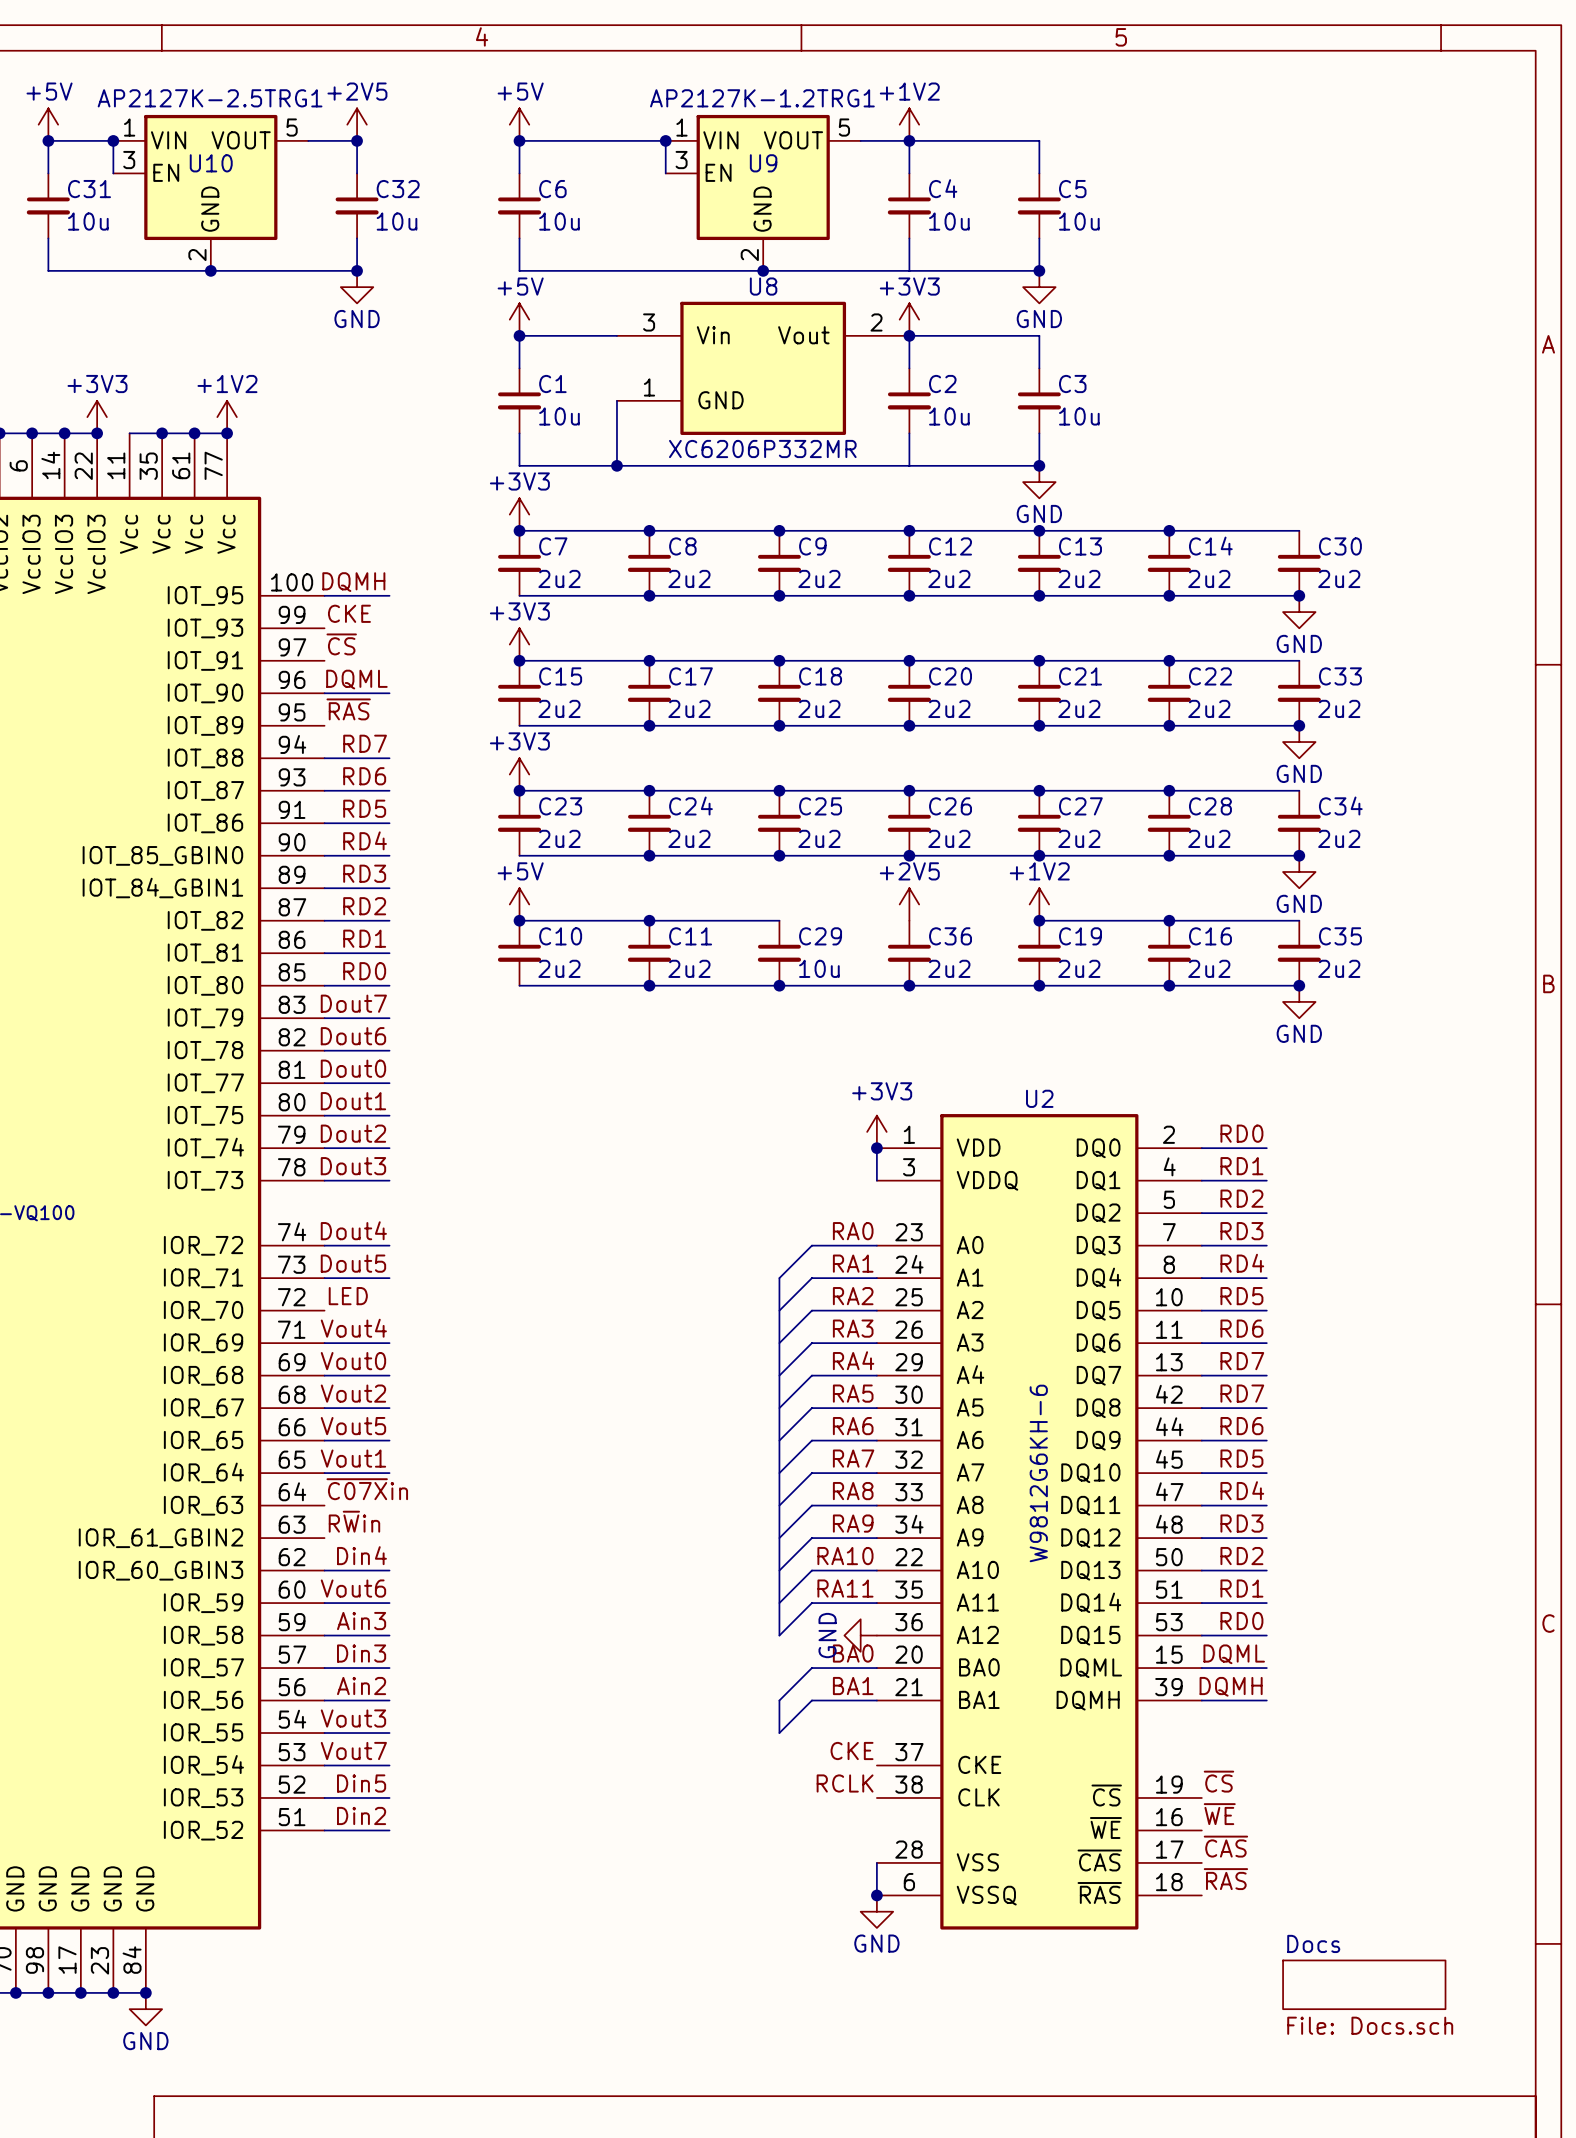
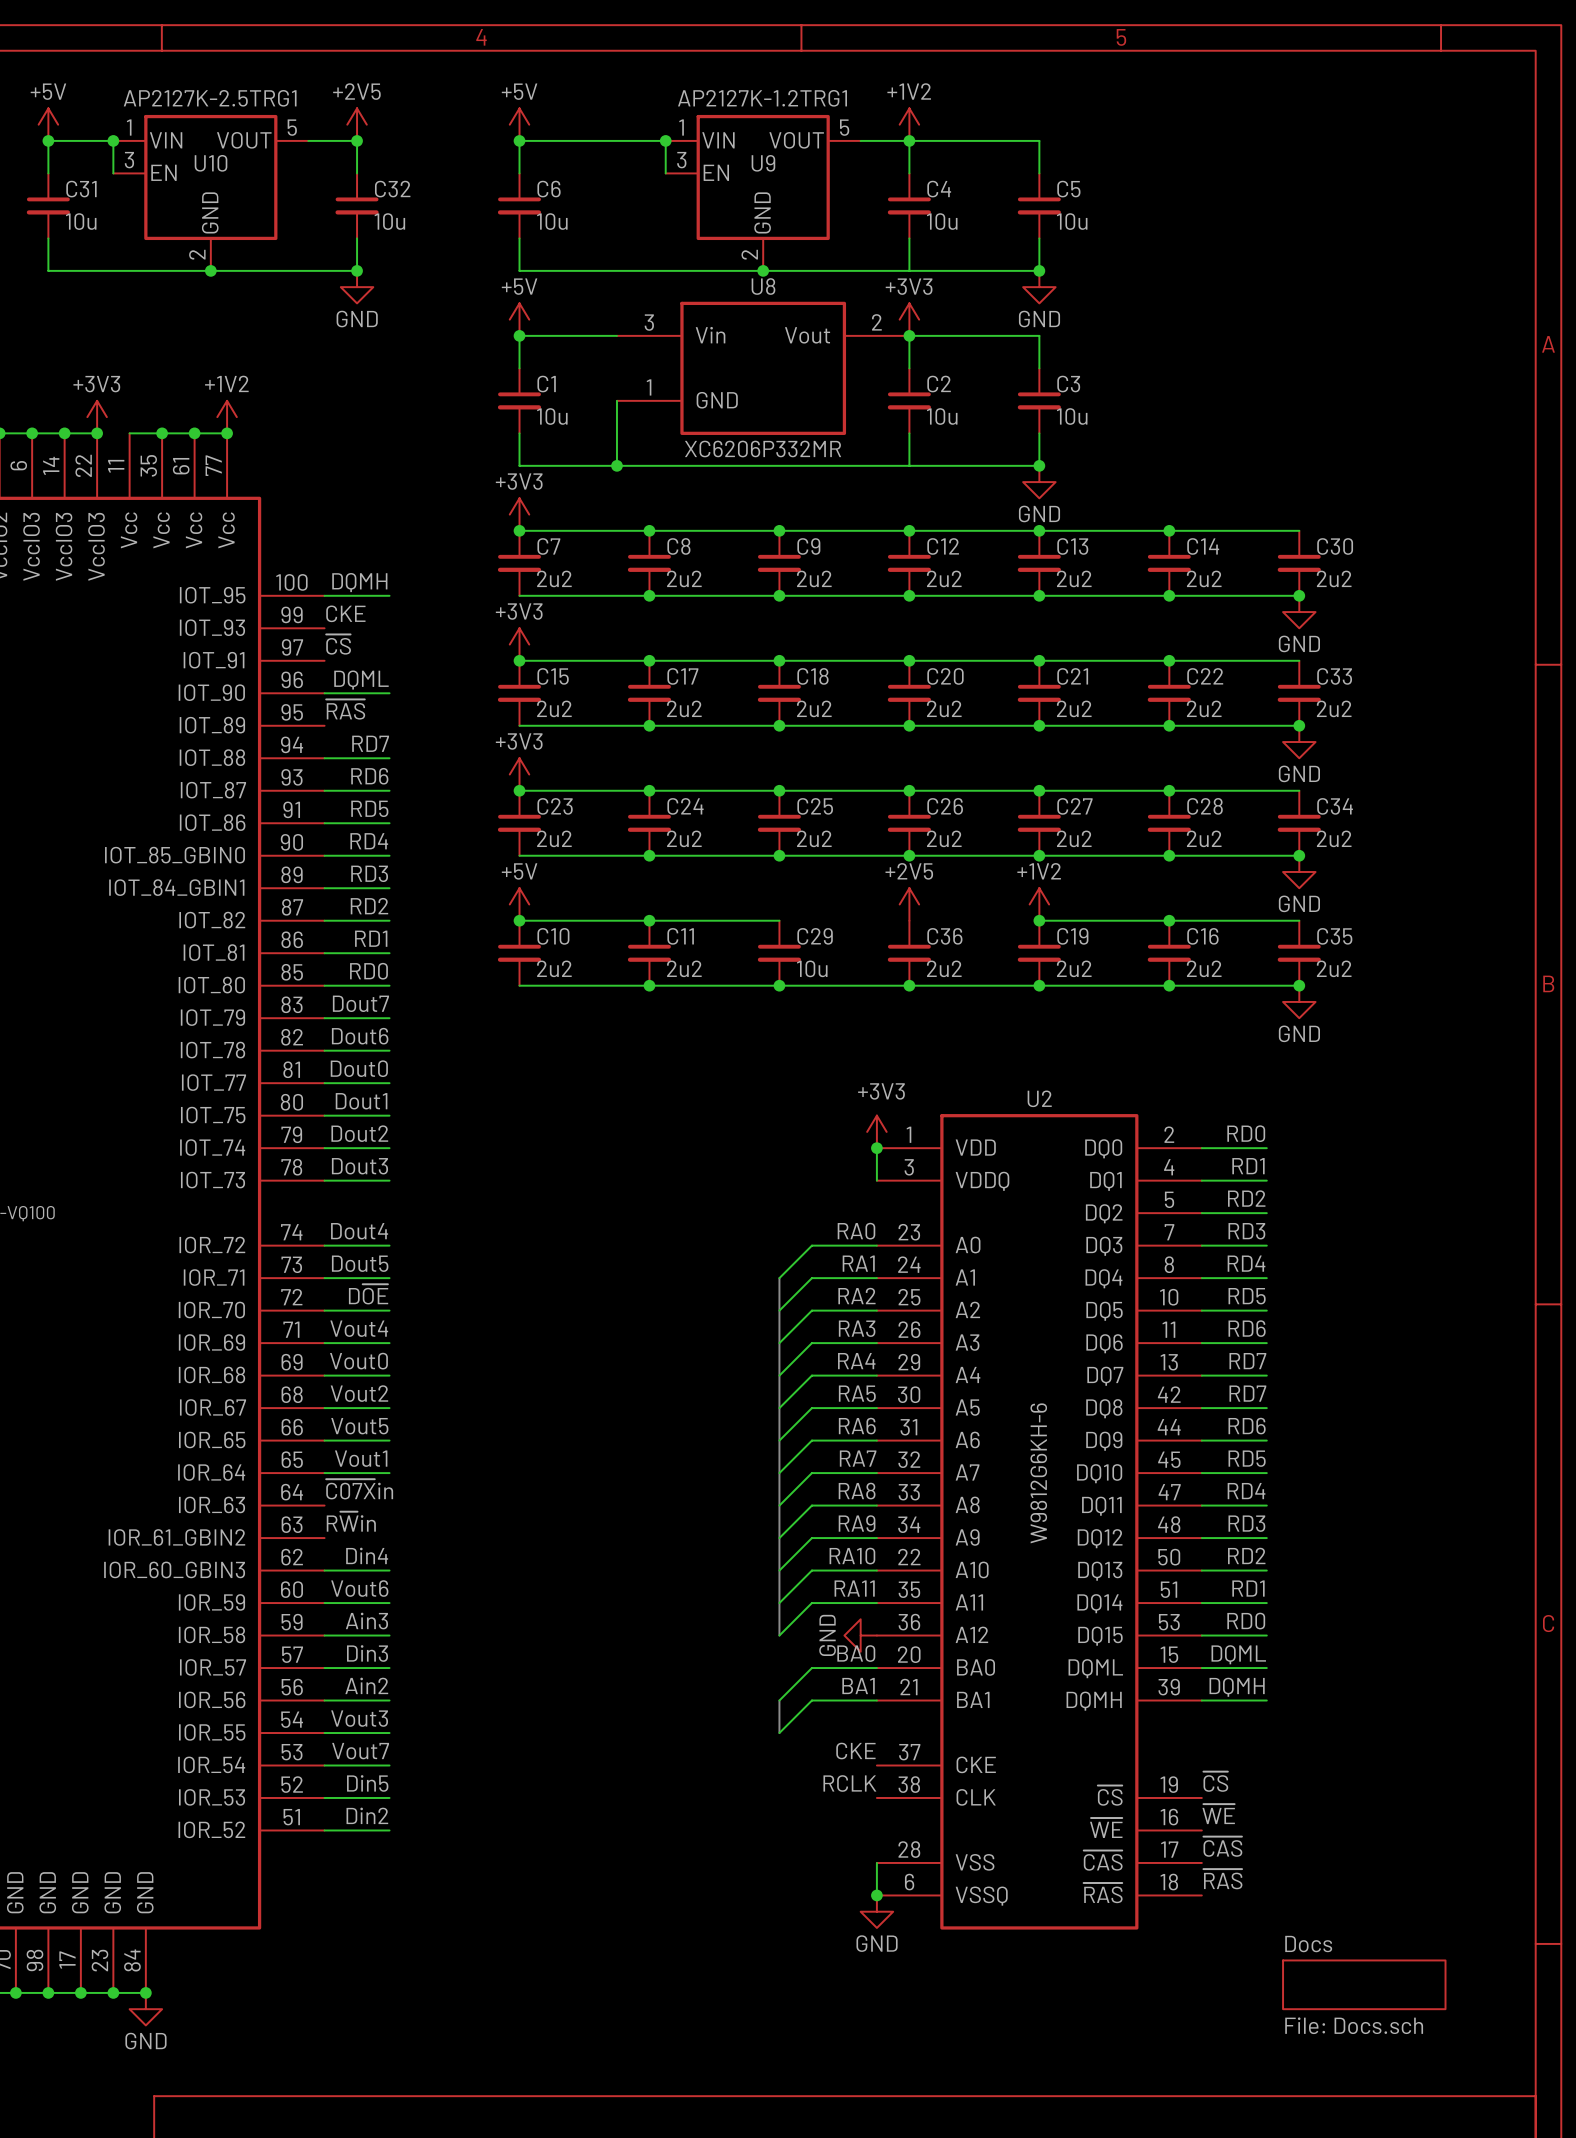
label: none -> D~{OE} (368, 1294)
label: LED (348, 1296) -> none
wire: none -> (324, 1310) (389, 1310)

